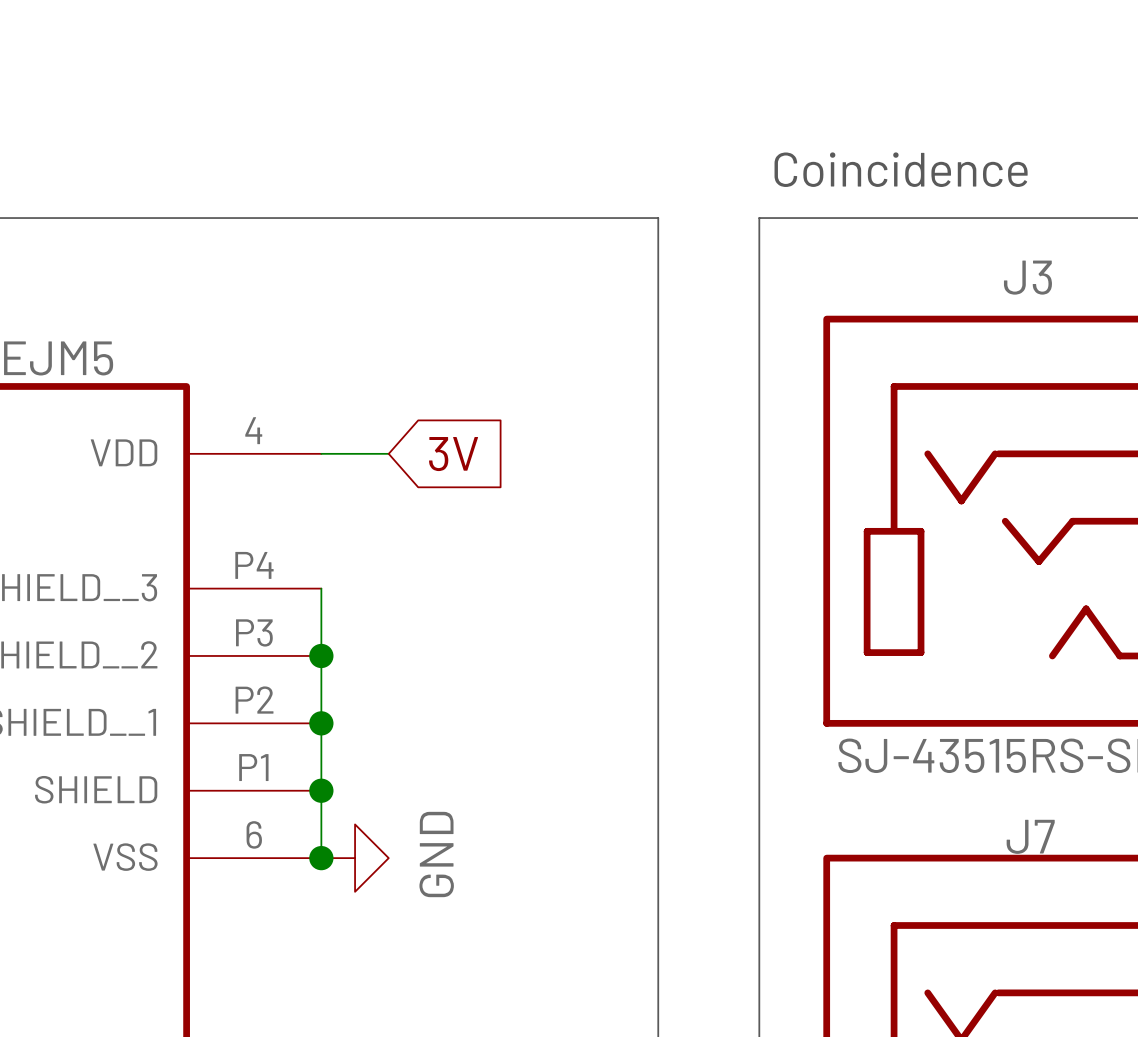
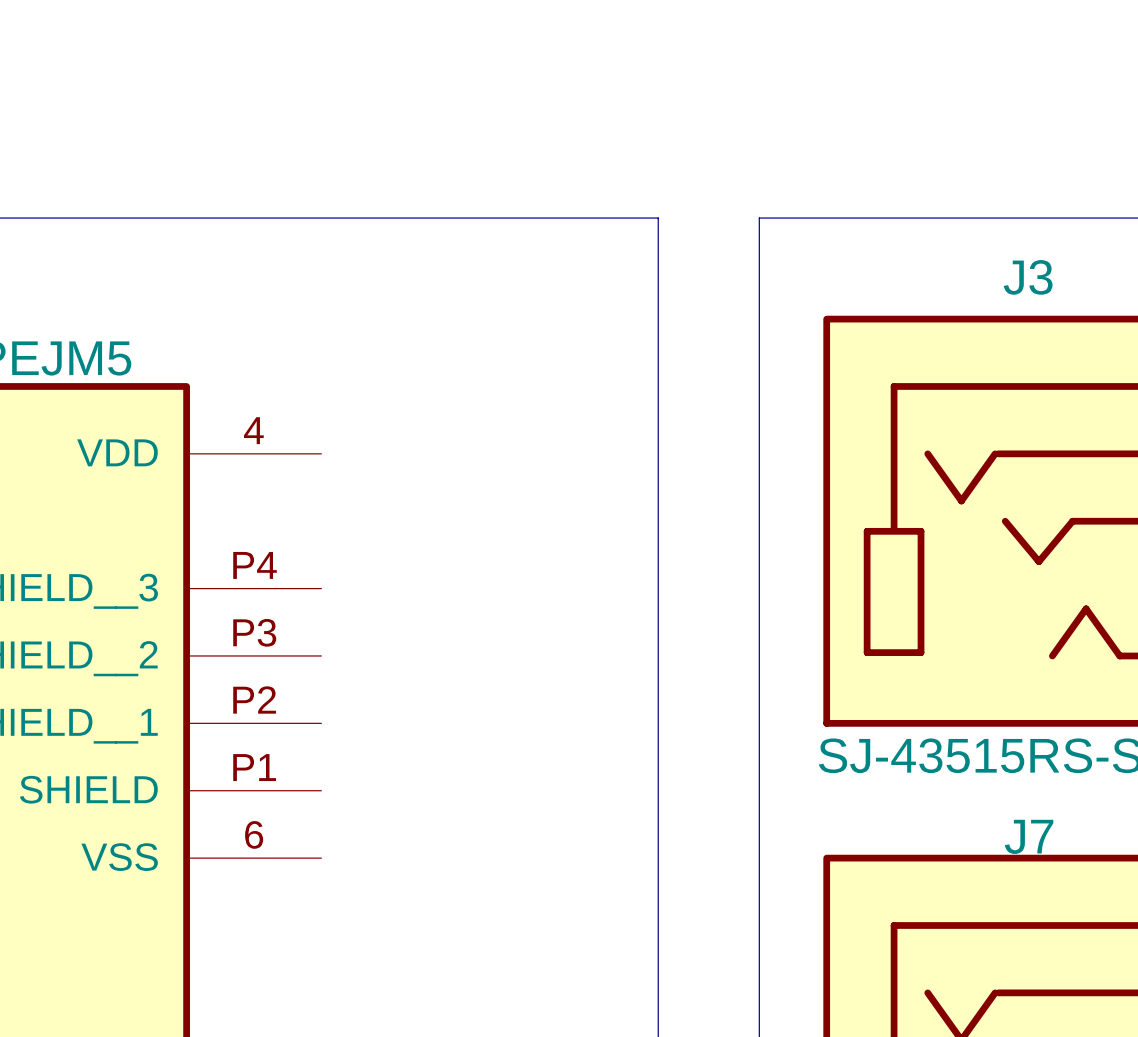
text: Coincidence (901, 169) -> none
wire: (321, 453) (388, 453) -> none
global label: 3V (453, 454) -> none
wire: (321, 588) (321, 858) -> none
junction: (321, 655) -> none
junction: (321, 723) -> none
junction: (321, 790) -> none
junction: (321, 858) -> none
power symbol: GND (355, 858) -> none

